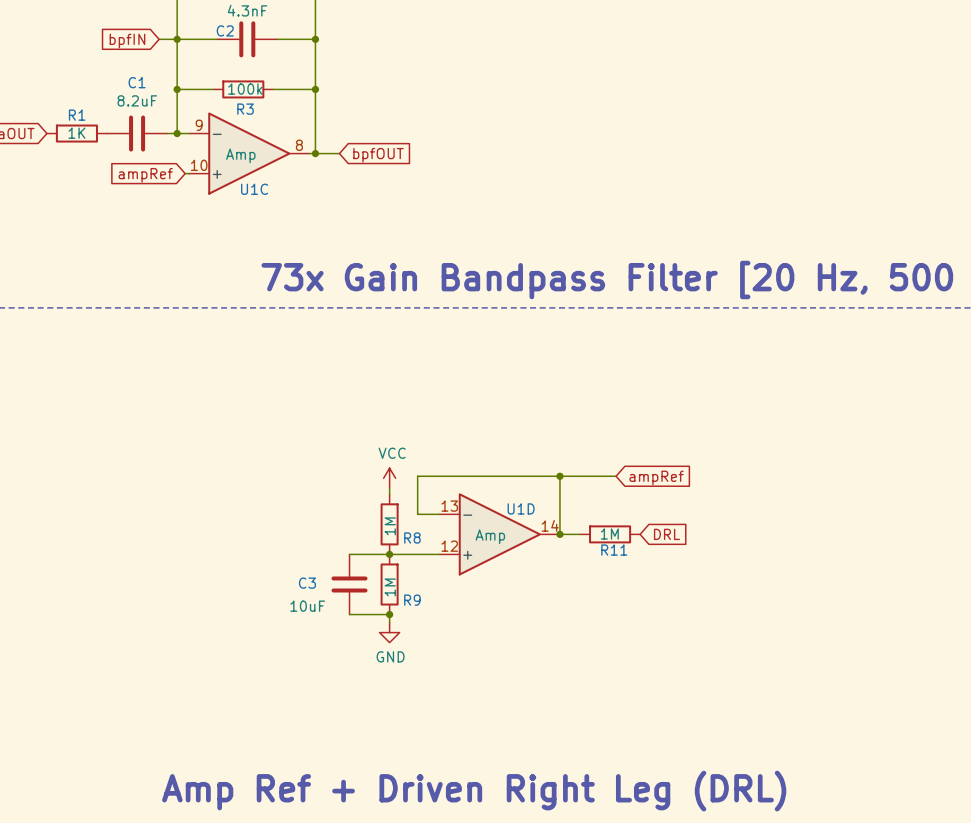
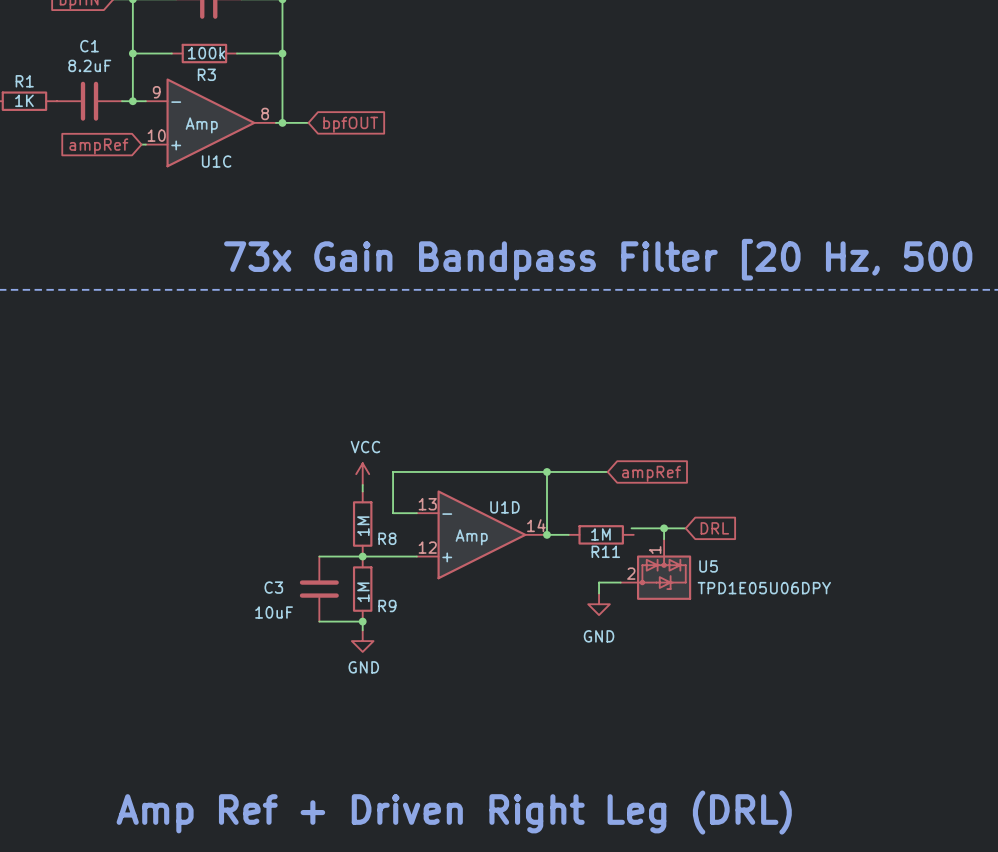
wire: none -> (631, 528) (685, 528)
wire: none -> (664, 528) (664, 539)
junction: none -> (664, 528)
global label position: DRL (666, 534) -> DRL (714, 528)
U5: none -> TPD1E05U06DPY (655, 569)
wire: none -> (620, 582) (599, 582) (599, 593)
power symbol: none -> GND (599, 604)

